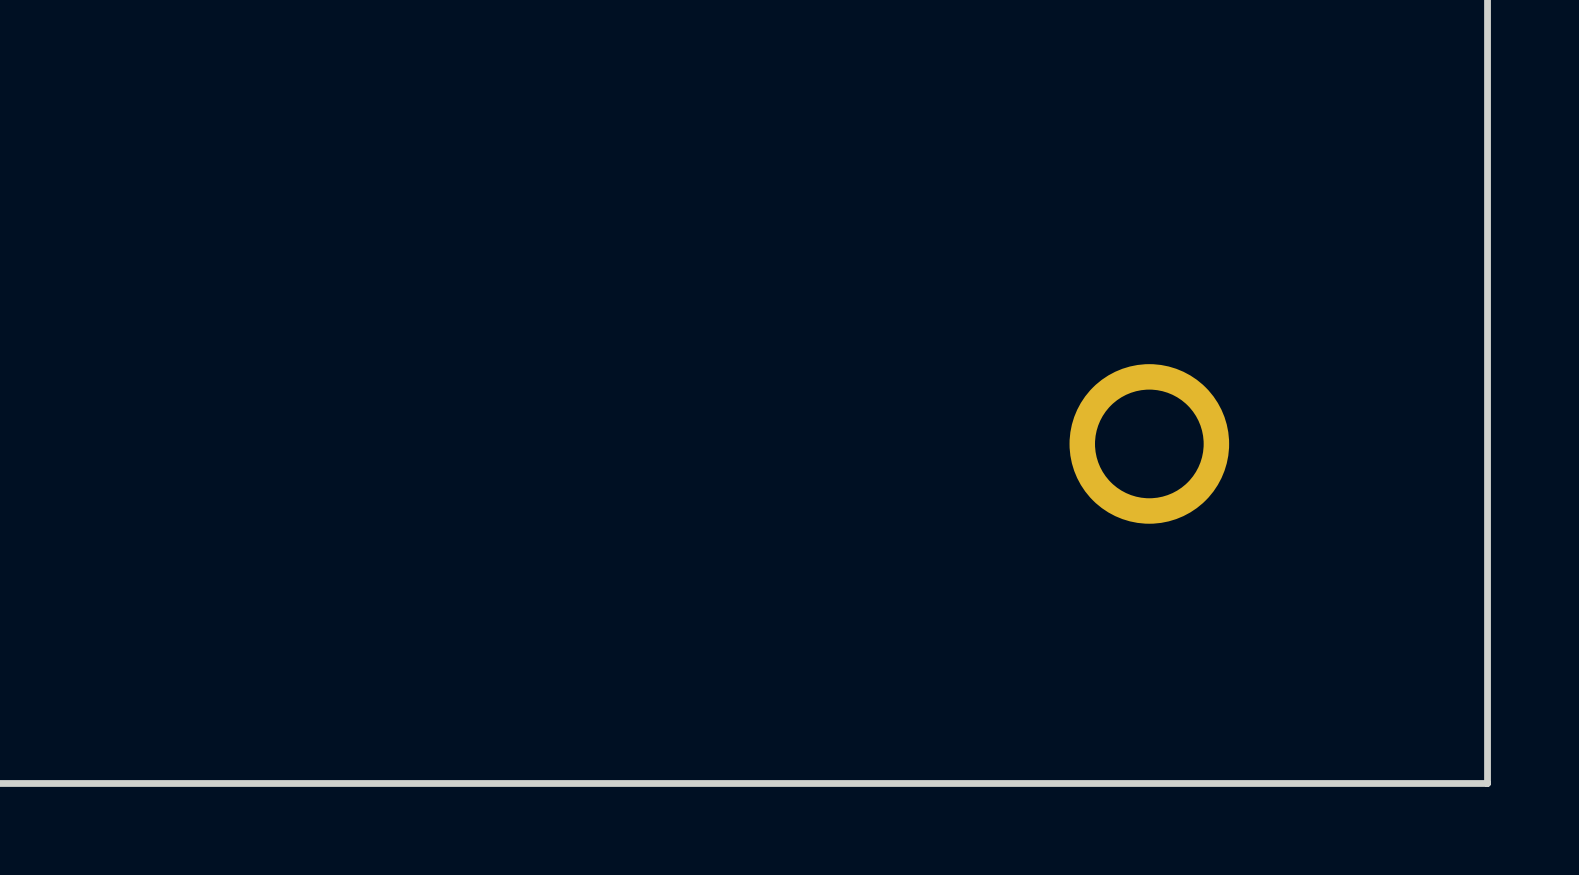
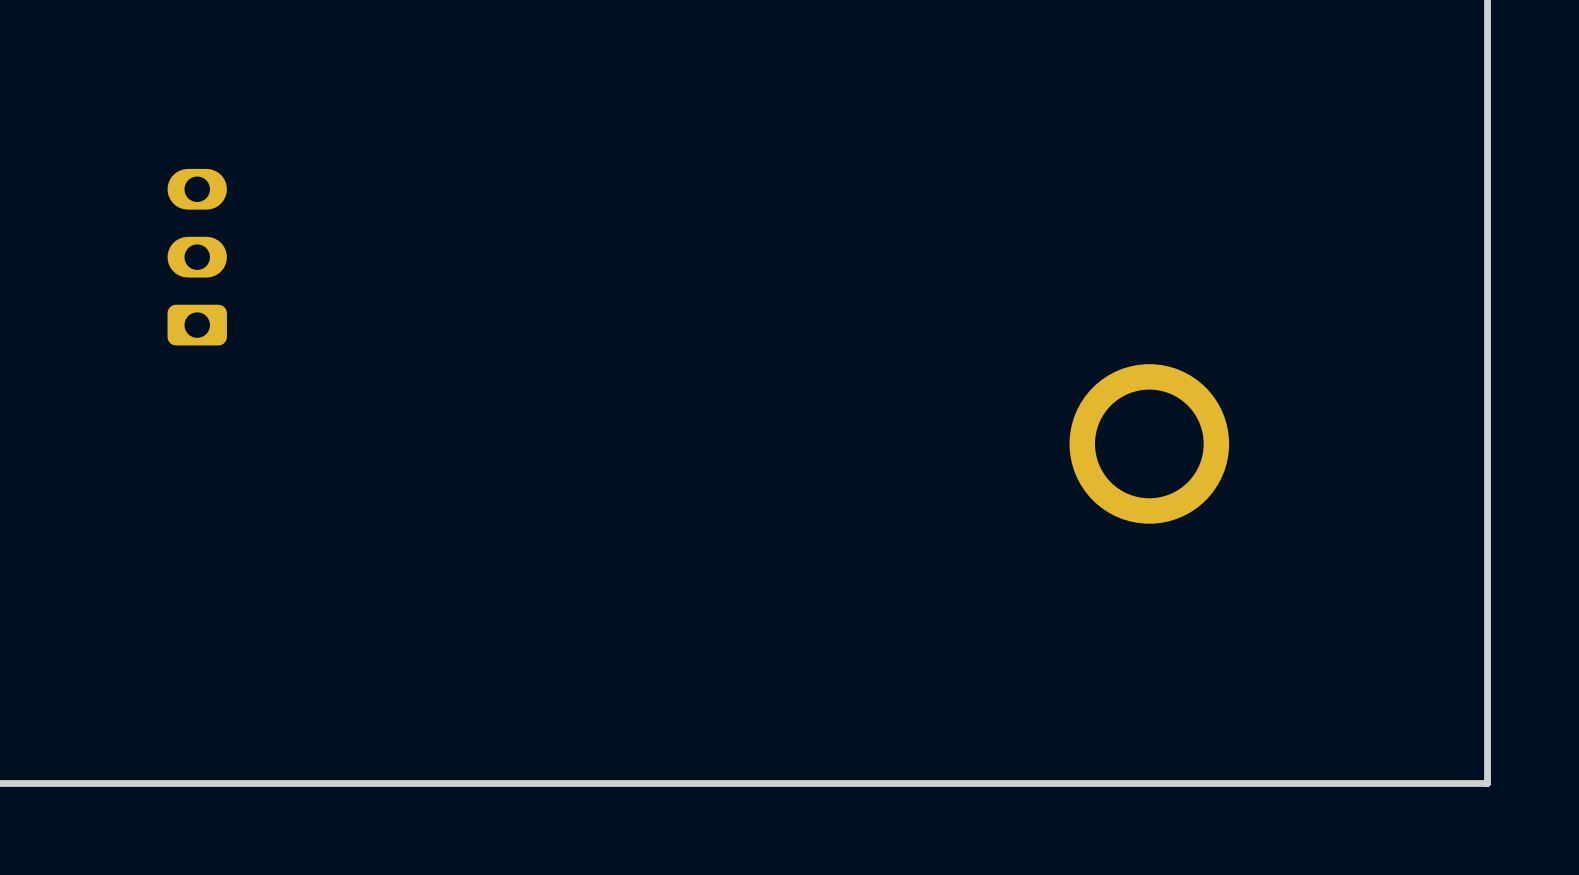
part: none -> (197, 257)

